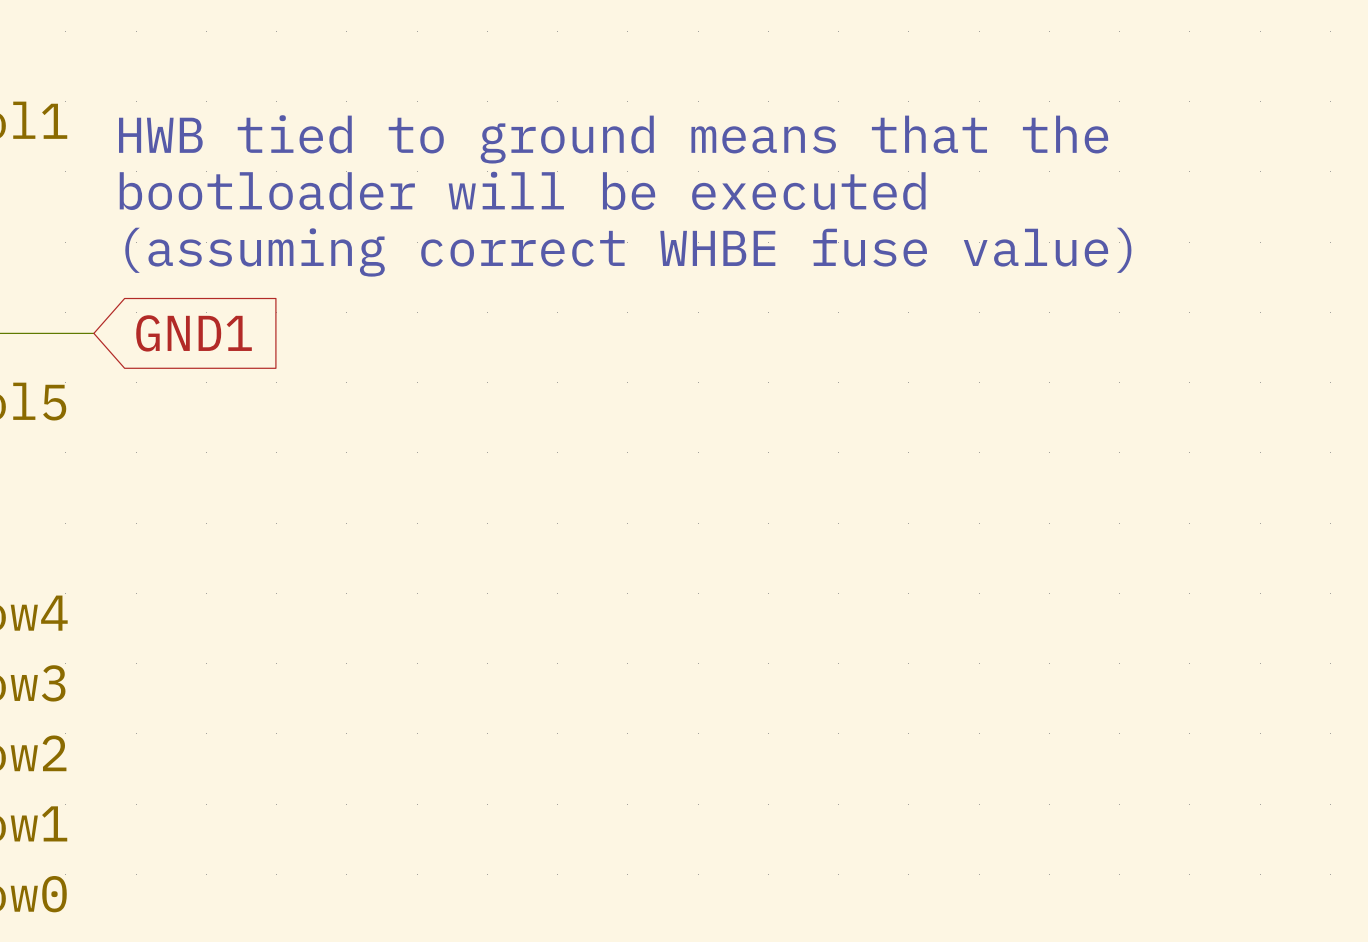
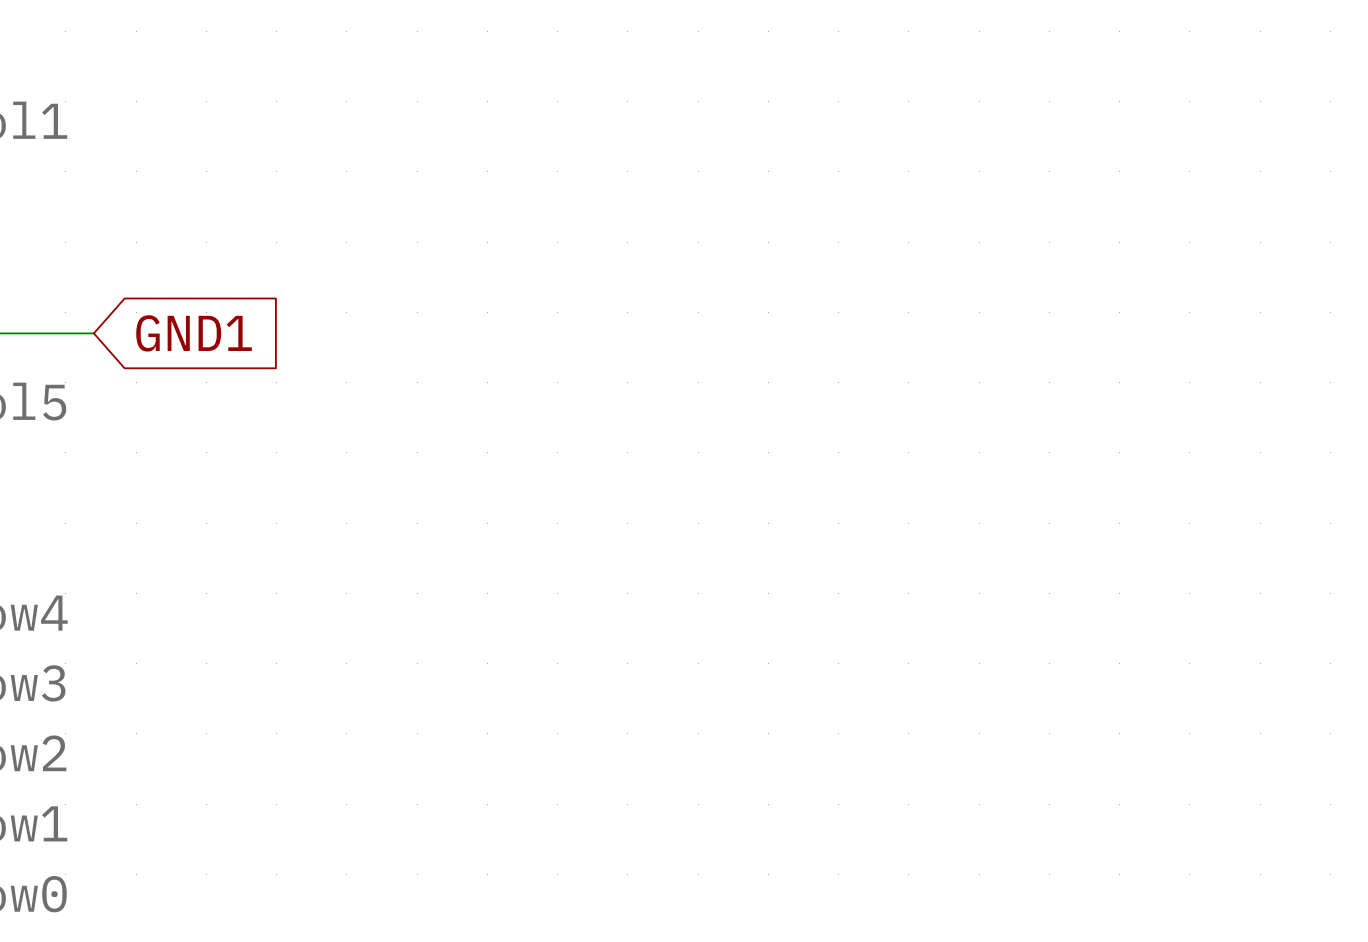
text: HWB tied to ground means that the (613, 139) -> none
text: bootloader will be executed (522, 190) -> none
text: (assuming correct WHBE fuse value) (628, 252) -> none

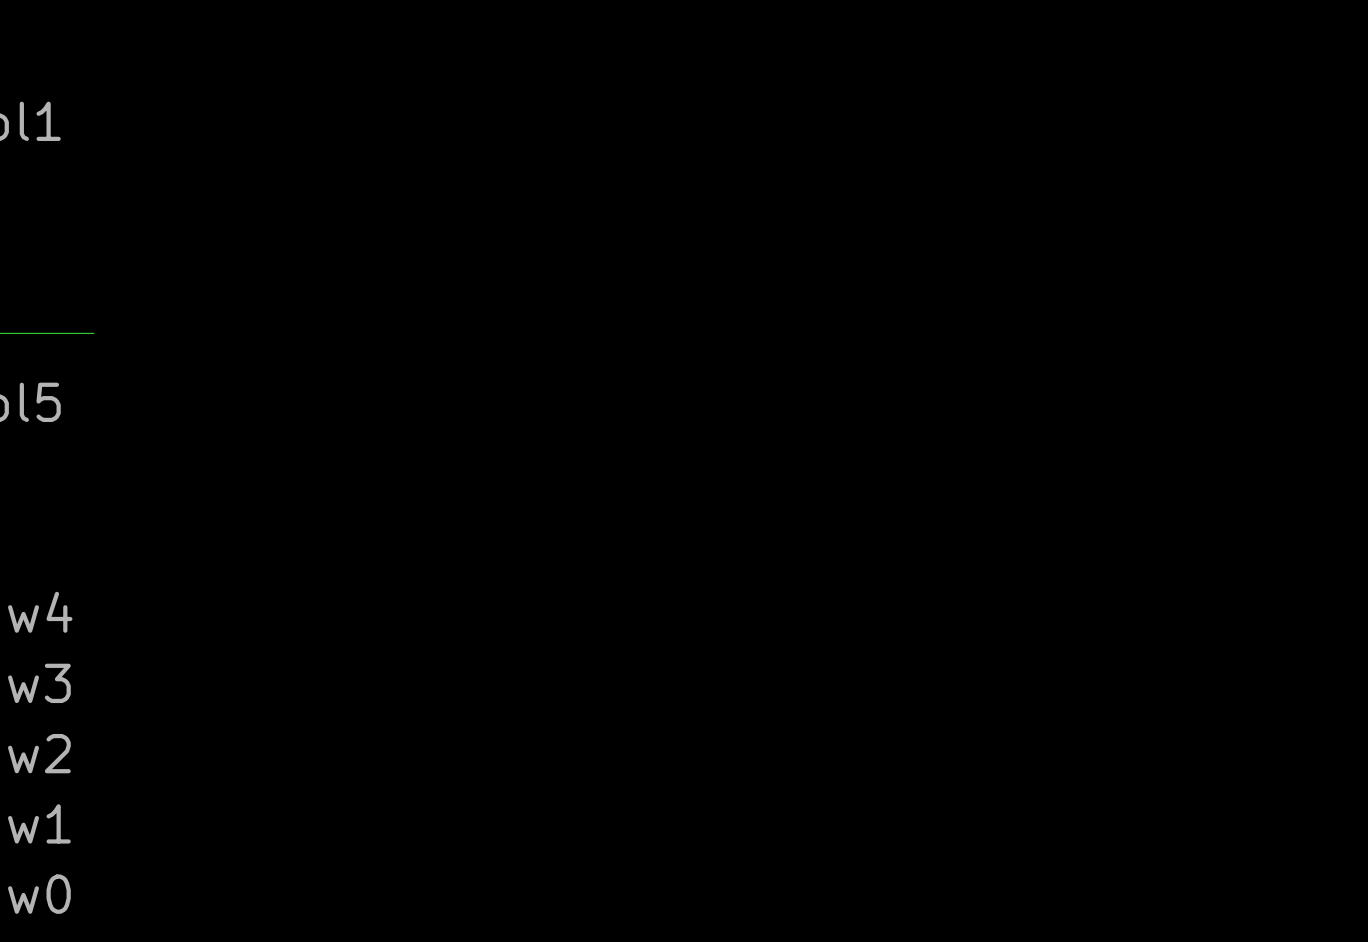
global label: GND1 (194, 333) -> none

